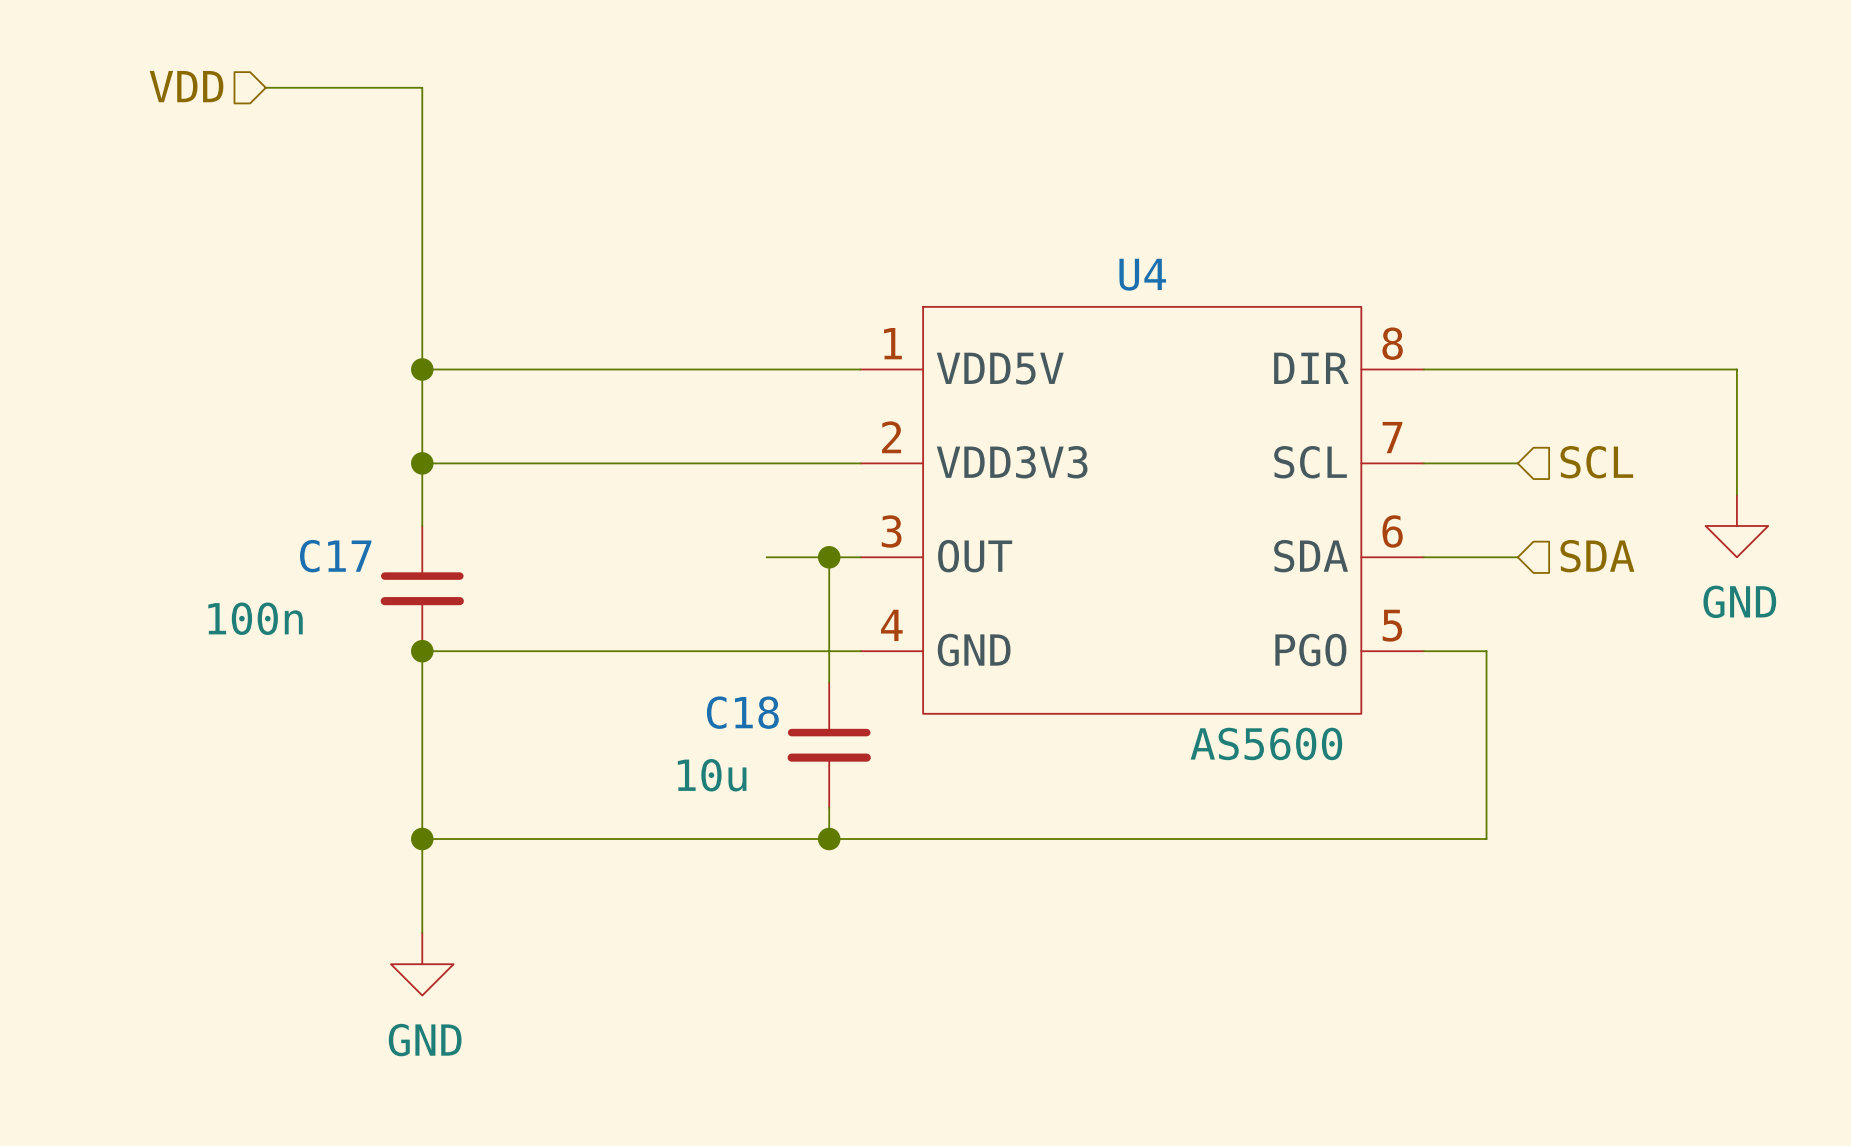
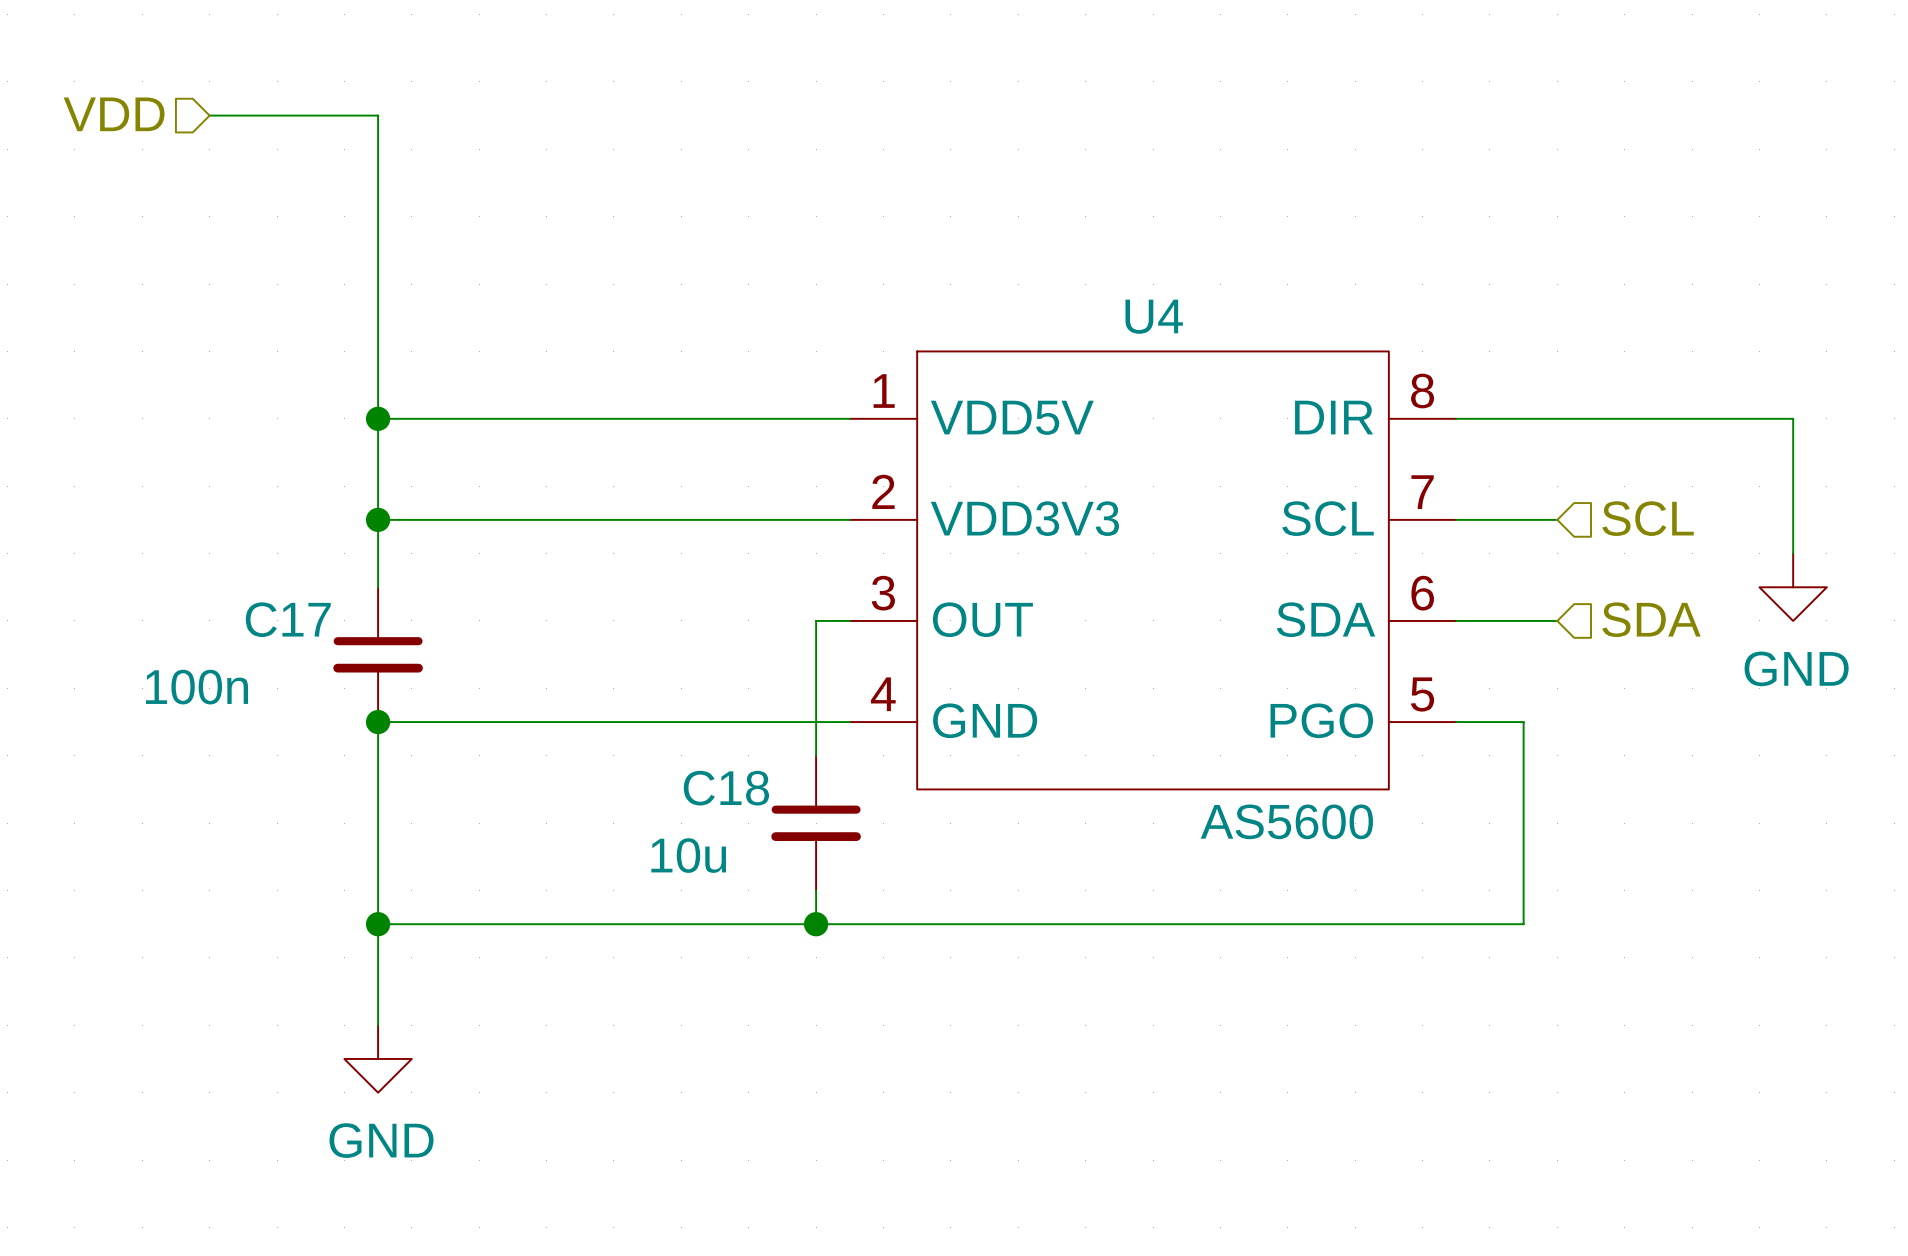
wire: (766, 557) (829, 557) -> none
junction: (829, 557) -> none

